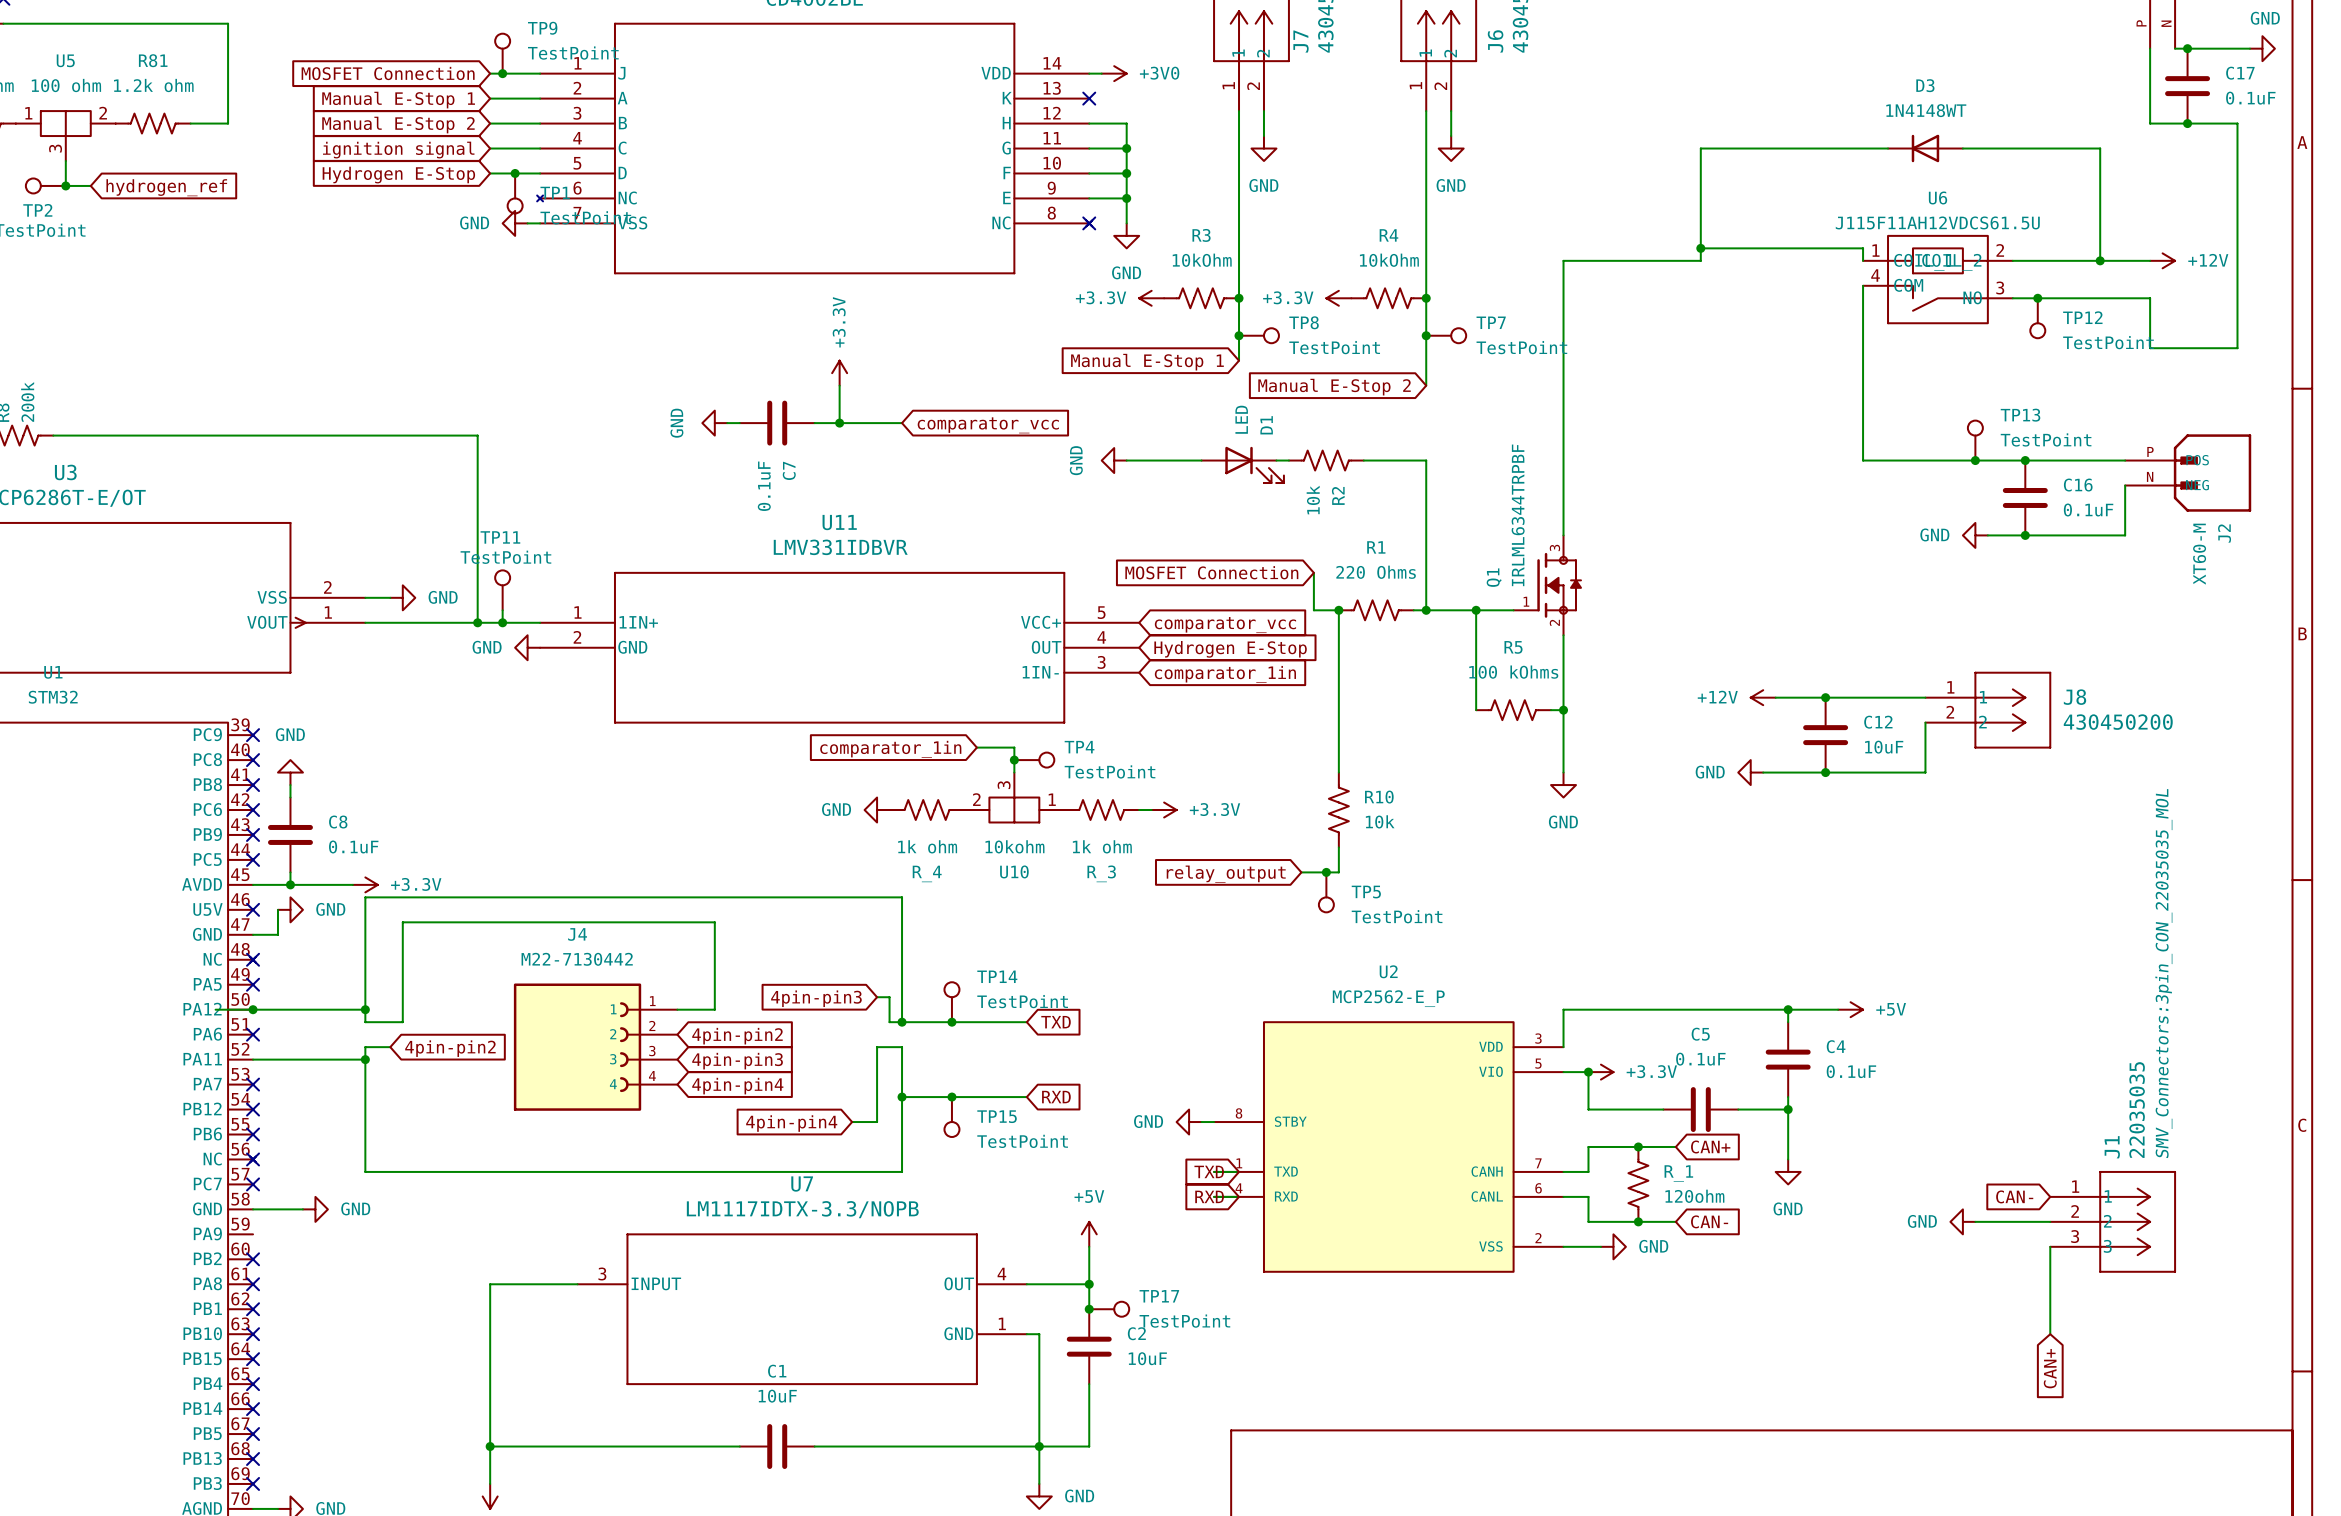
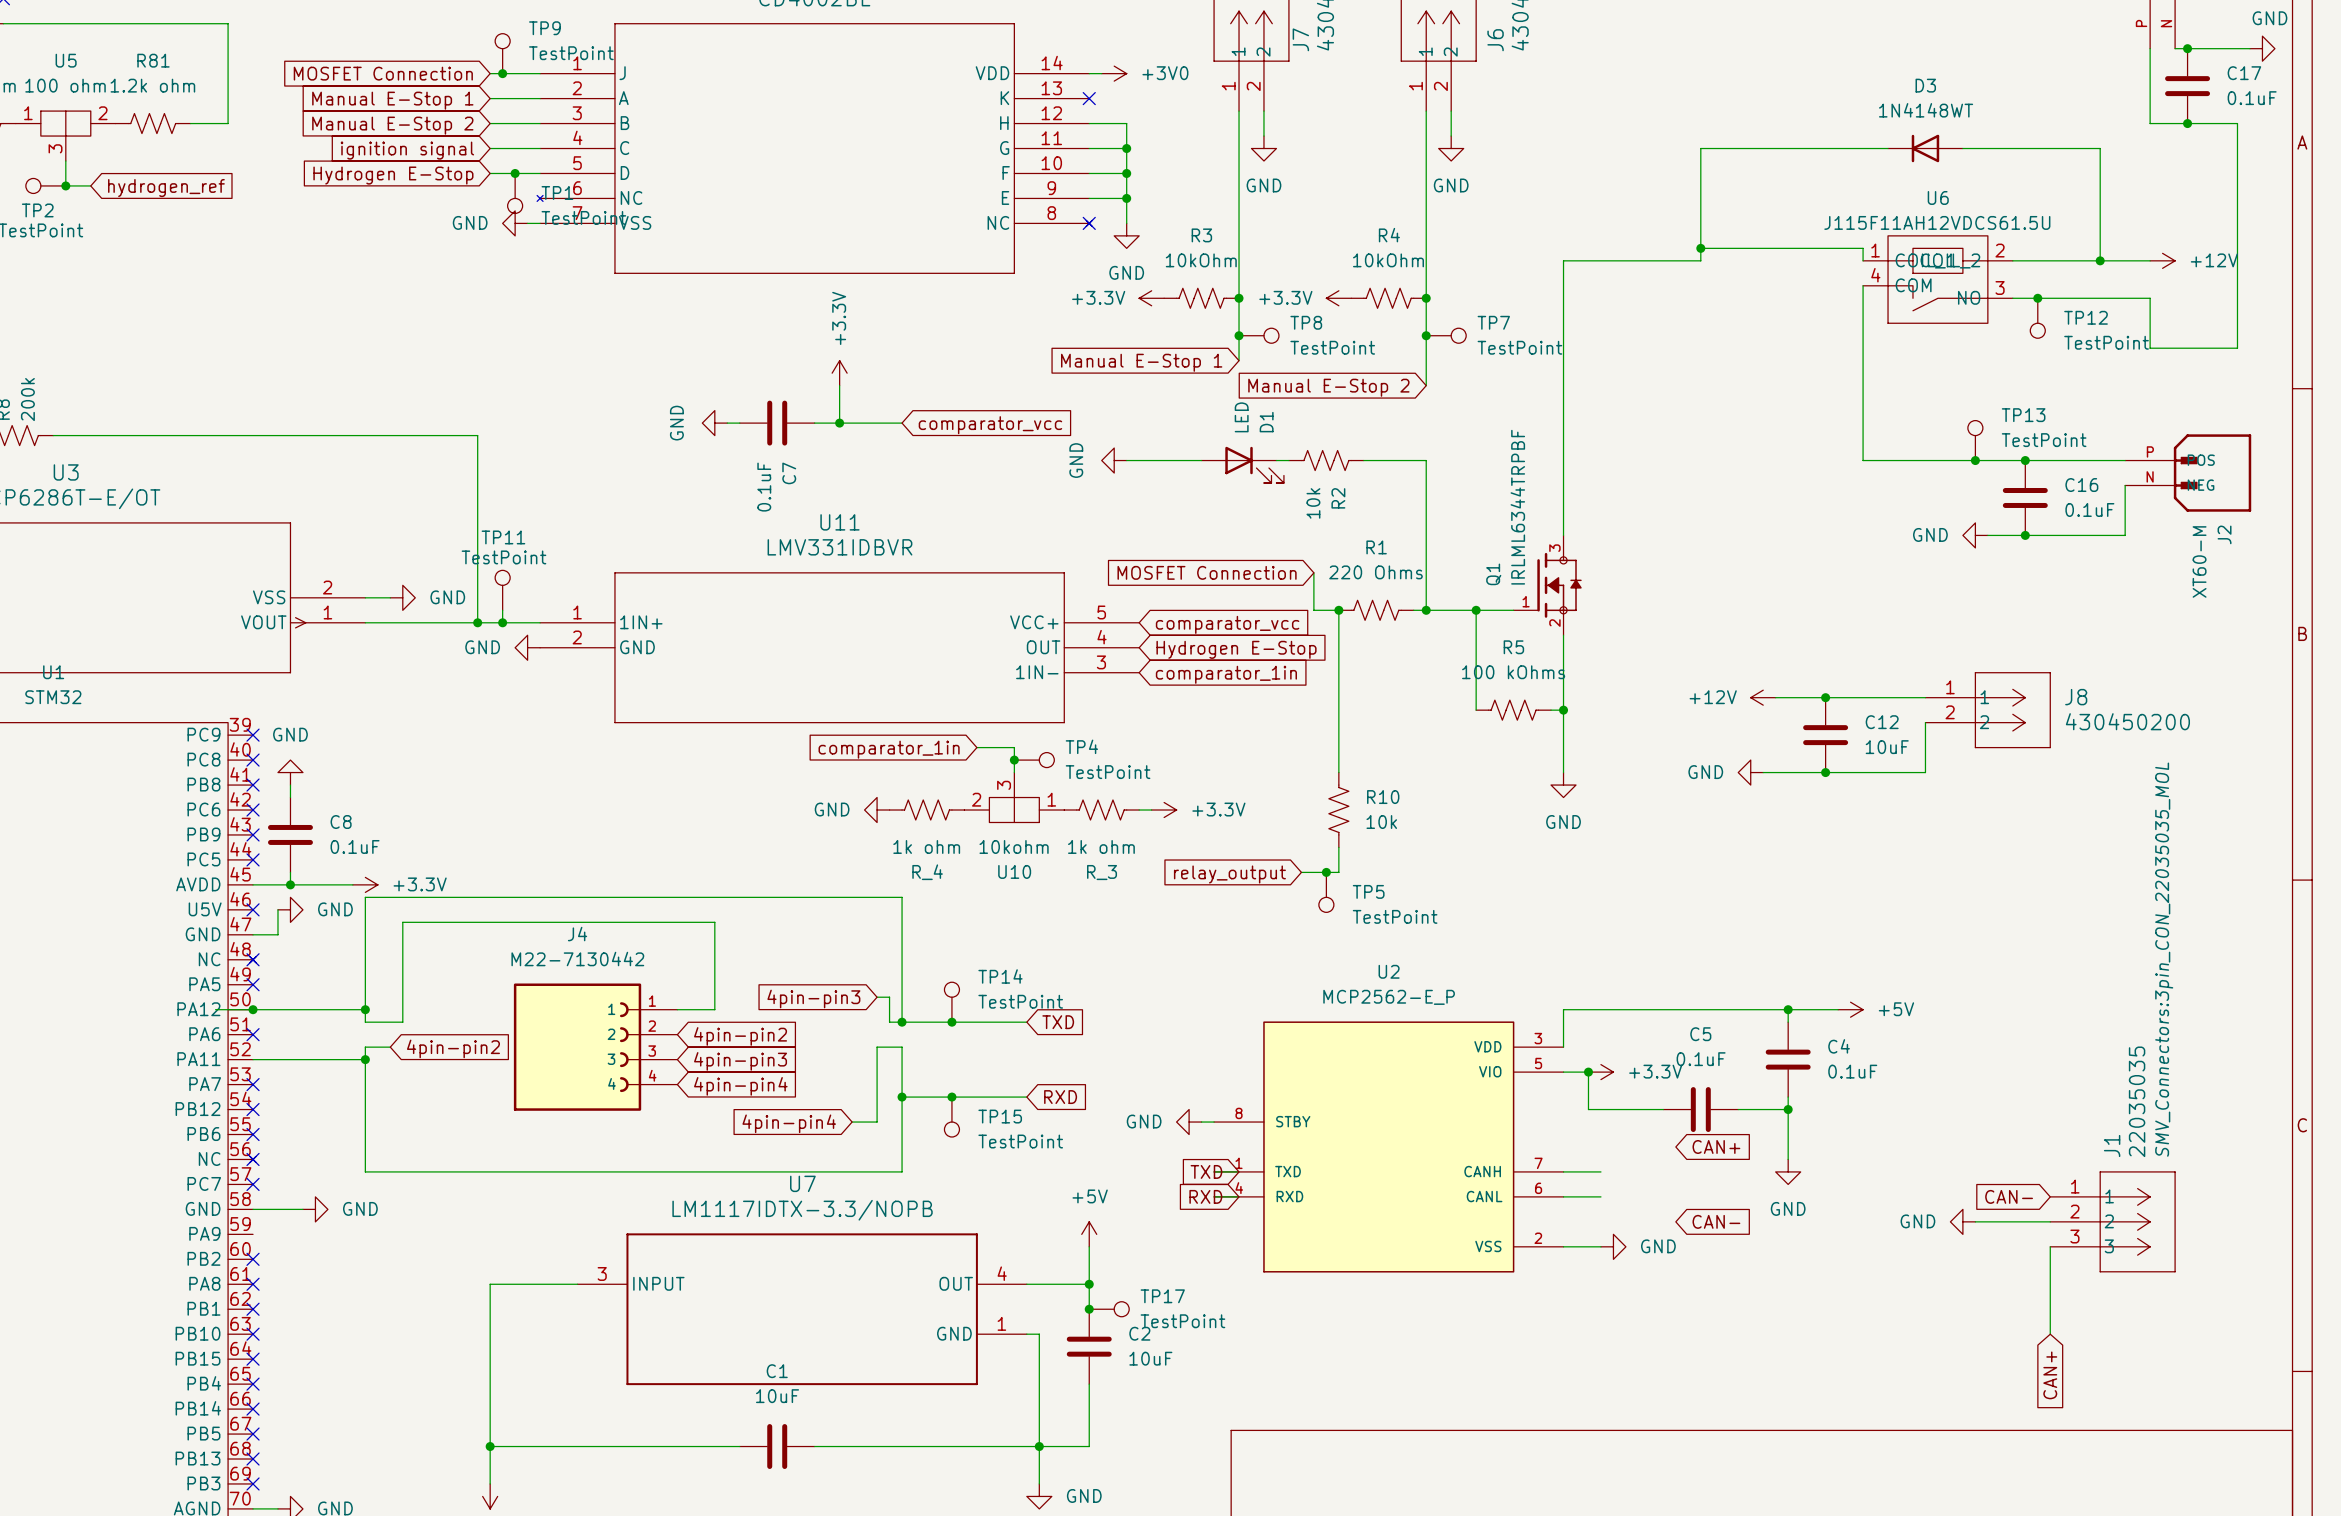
junction: (1638, 1146) -> none
wire: (1675, 1146) (1588, 1146) (1588, 1171) -> (1600, 1171) (1588, 1171)
R_1: 120ohm (1638, 1184) -> none
wire: (1588, 1196) (1588, 1221) (1675, 1221) -> (1588, 1196) (1600, 1196)
junction: (1638, 1221) -> none

